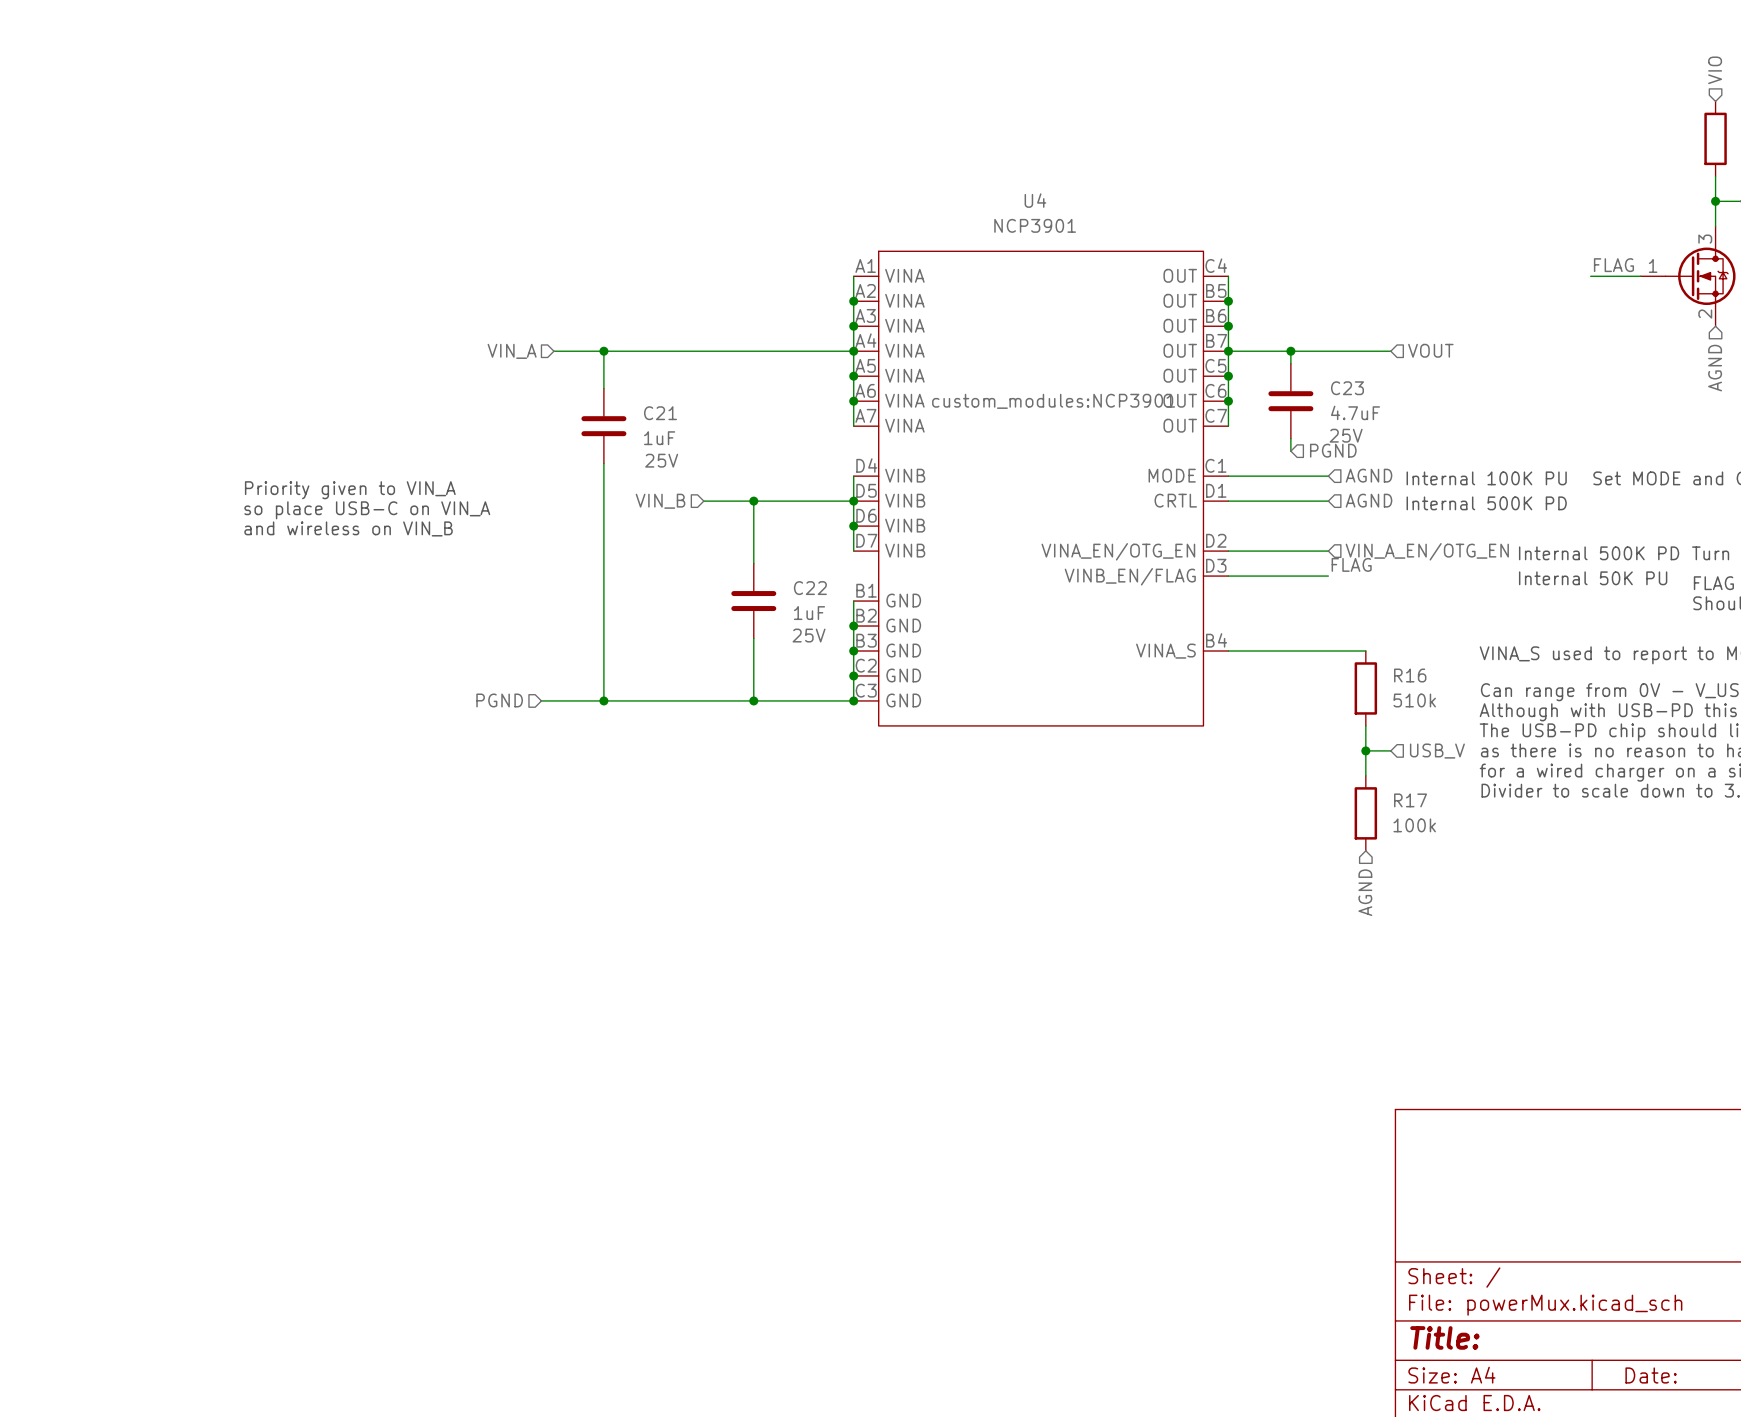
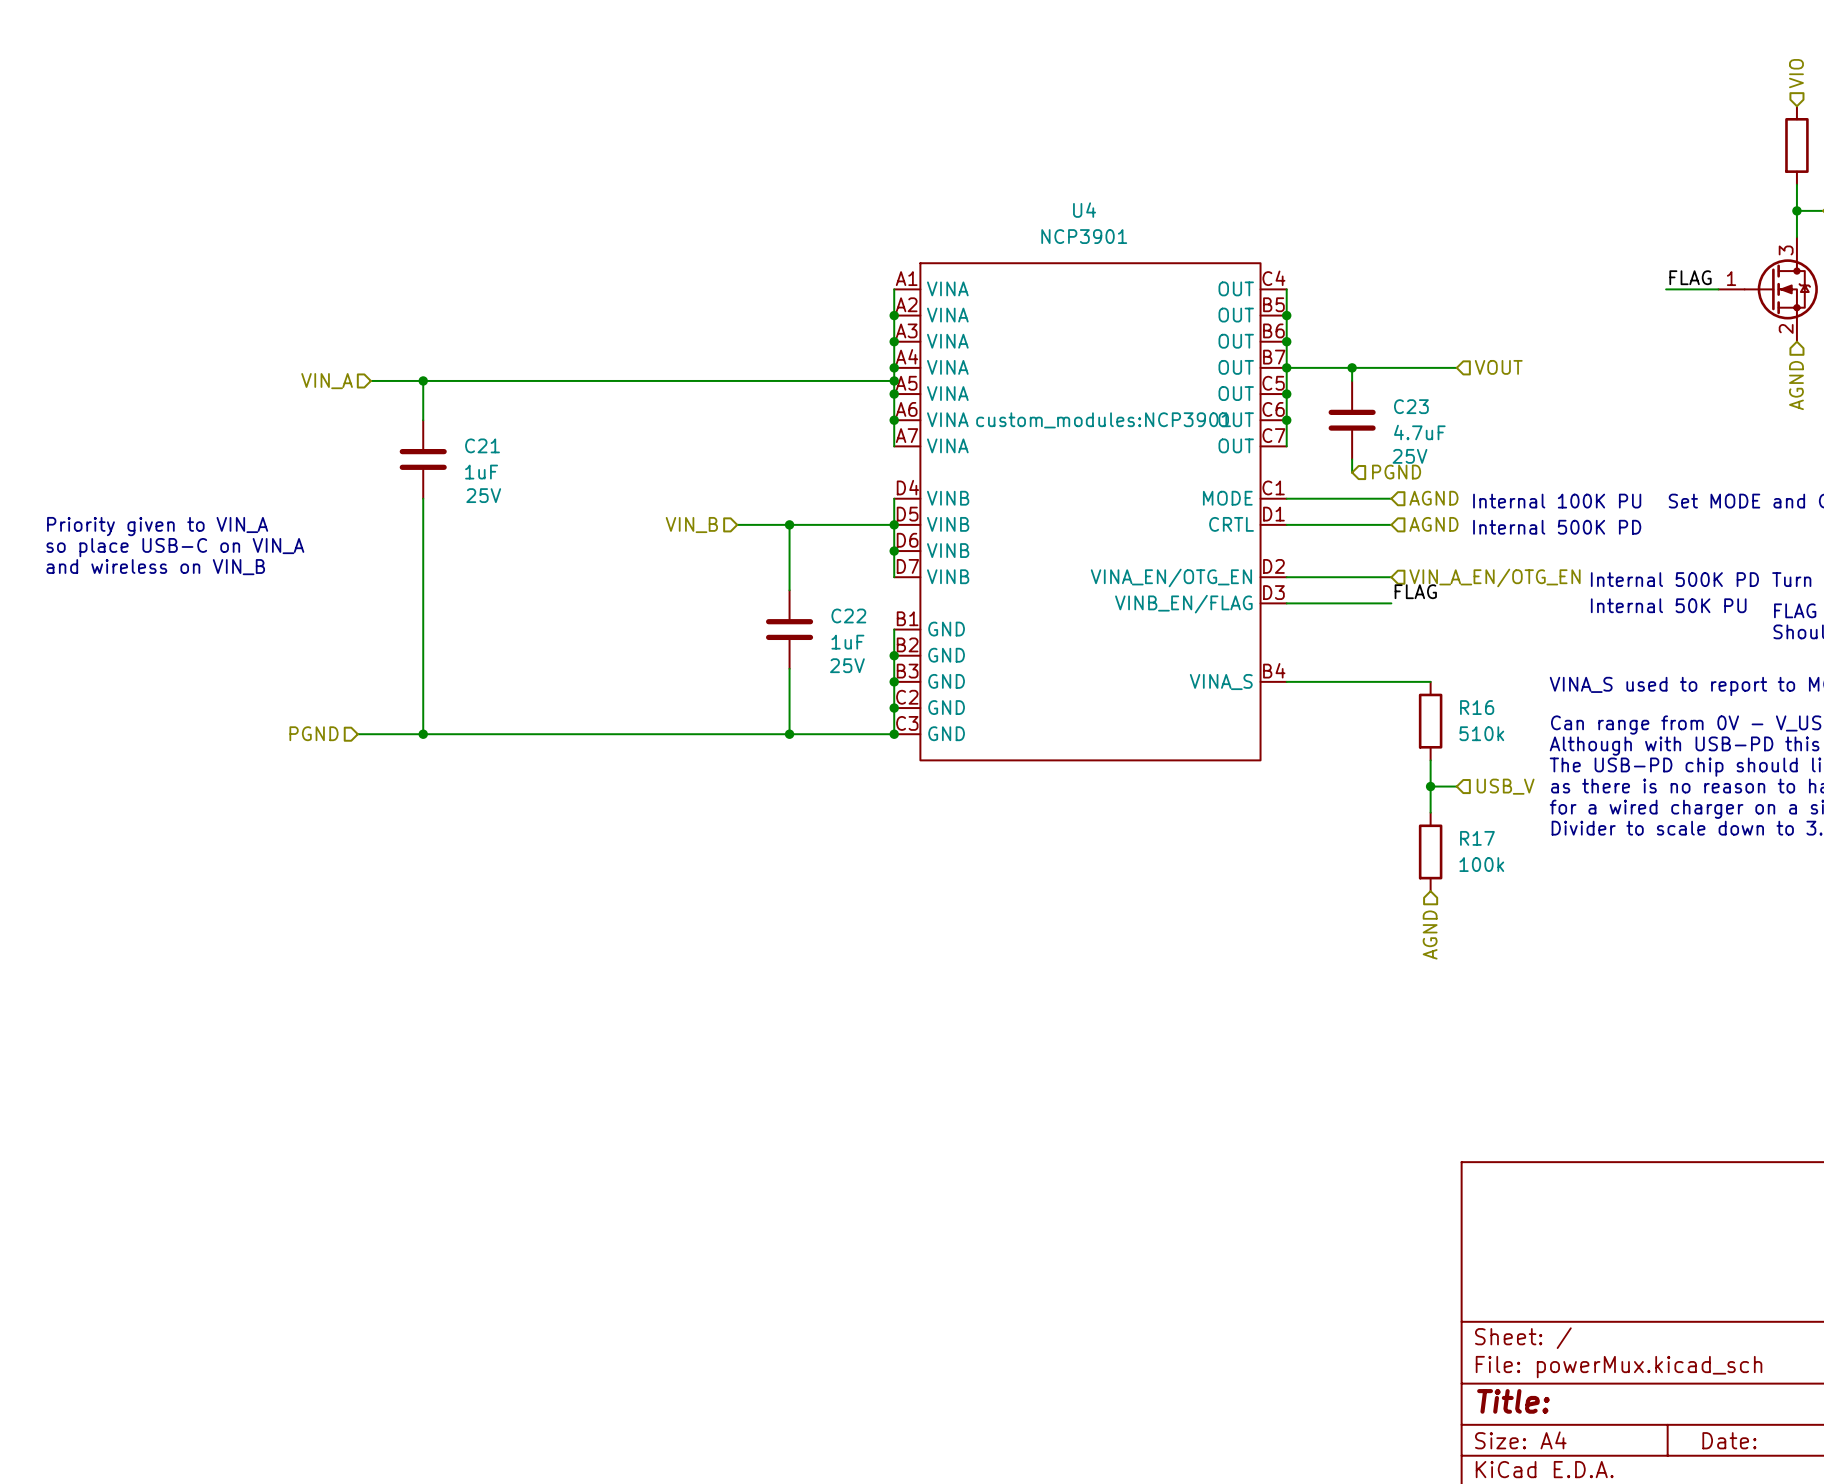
hierarchical label position: VIN_A (512, 351) -> VIN_A (327, 381)
wire: (553, 351) (853, 351) -> none
wire: (603, 351) (603, 388) -> (423, 380) (423, 420)
junction: (603, 351) -> none
wire: none -> (370, 380) (894, 380)
junction: none -> (423, 380)
junction: none -> (894, 380)
C21 position: (603, 426) -> (423, 459)
wire: (603, 463) (603, 700) -> none
wire: none -> (423, 498) (423, 734)
text position: Priority given to VIN_A (350, 490) -> Priority given to VIN_A (157, 526)
text position: so place USB-C on VIN_A (367, 510) -> so place USB-C on VIN_A (175, 547)
text position: and wireless on VIN_B (348, 528) -> and wireless on VIN_B (155, 567)
wire: none -> (357, 734) (567, 734)
junction: none -> (423, 734)
hierarchical label position: PGND (499, 700) -> PGND (314, 733)
junction: (603, 700) -> none

